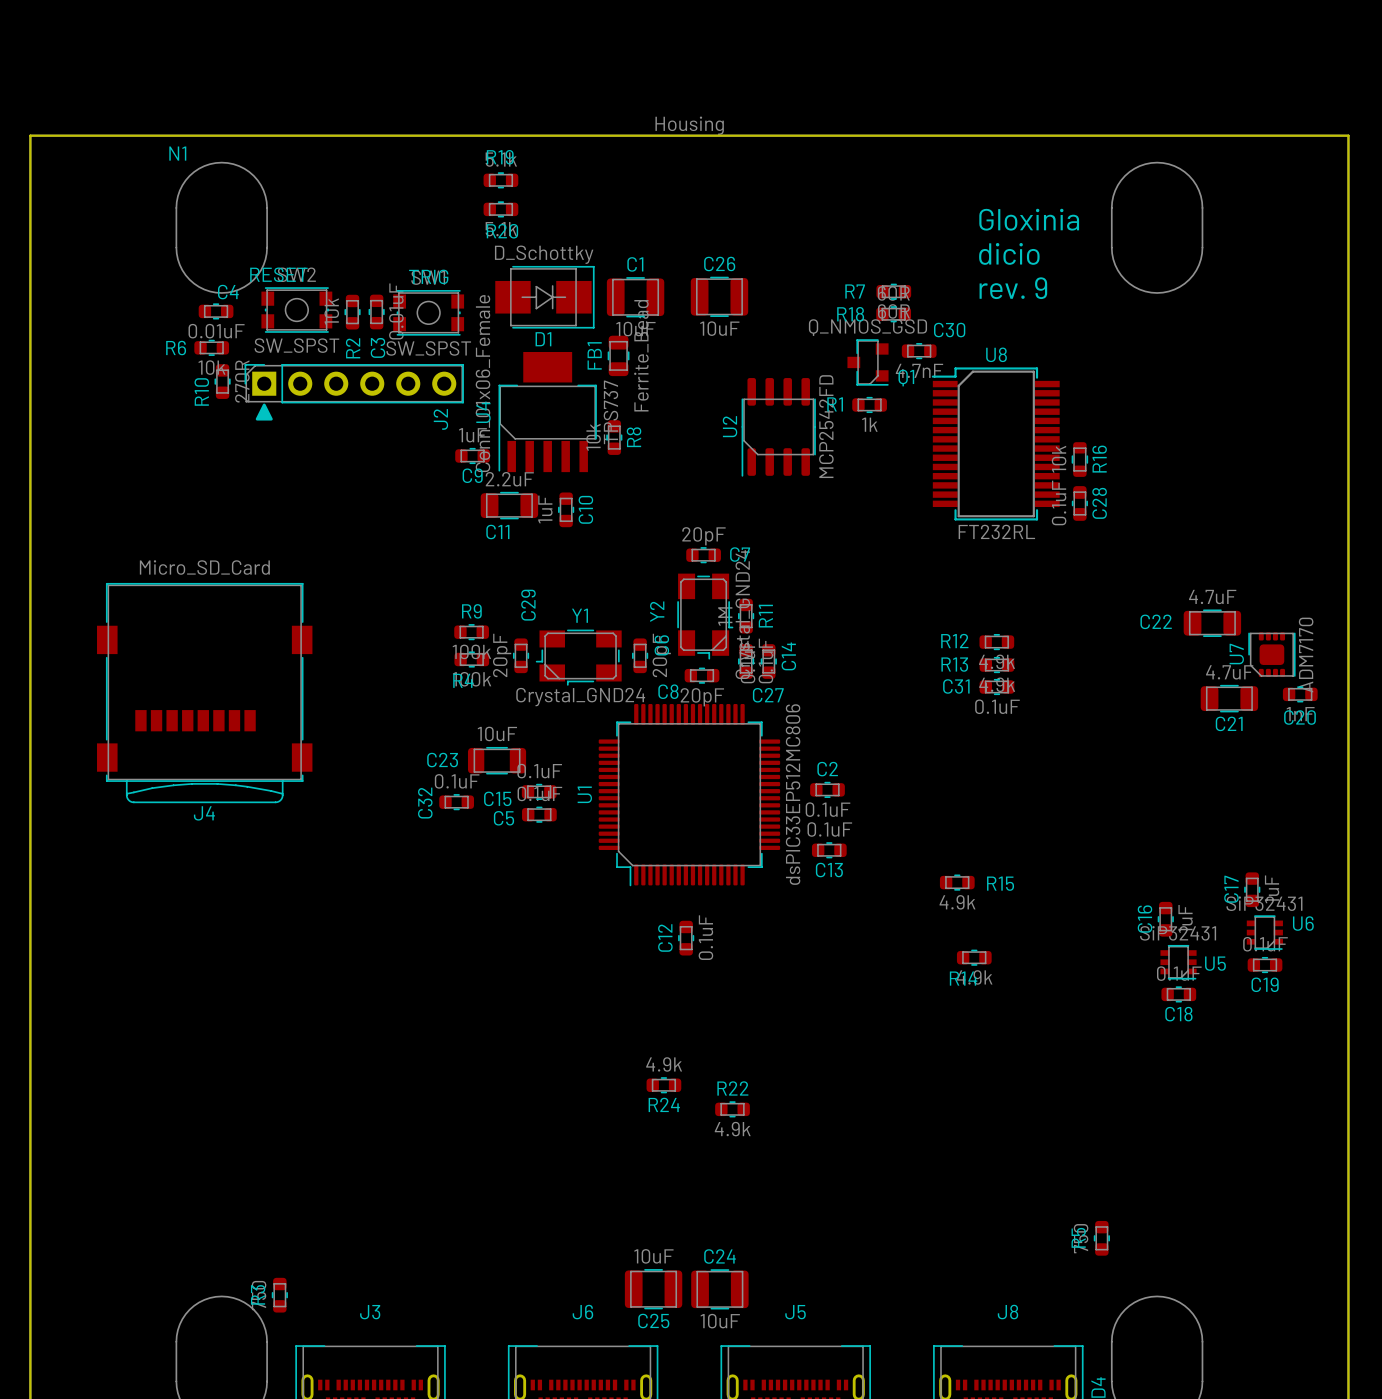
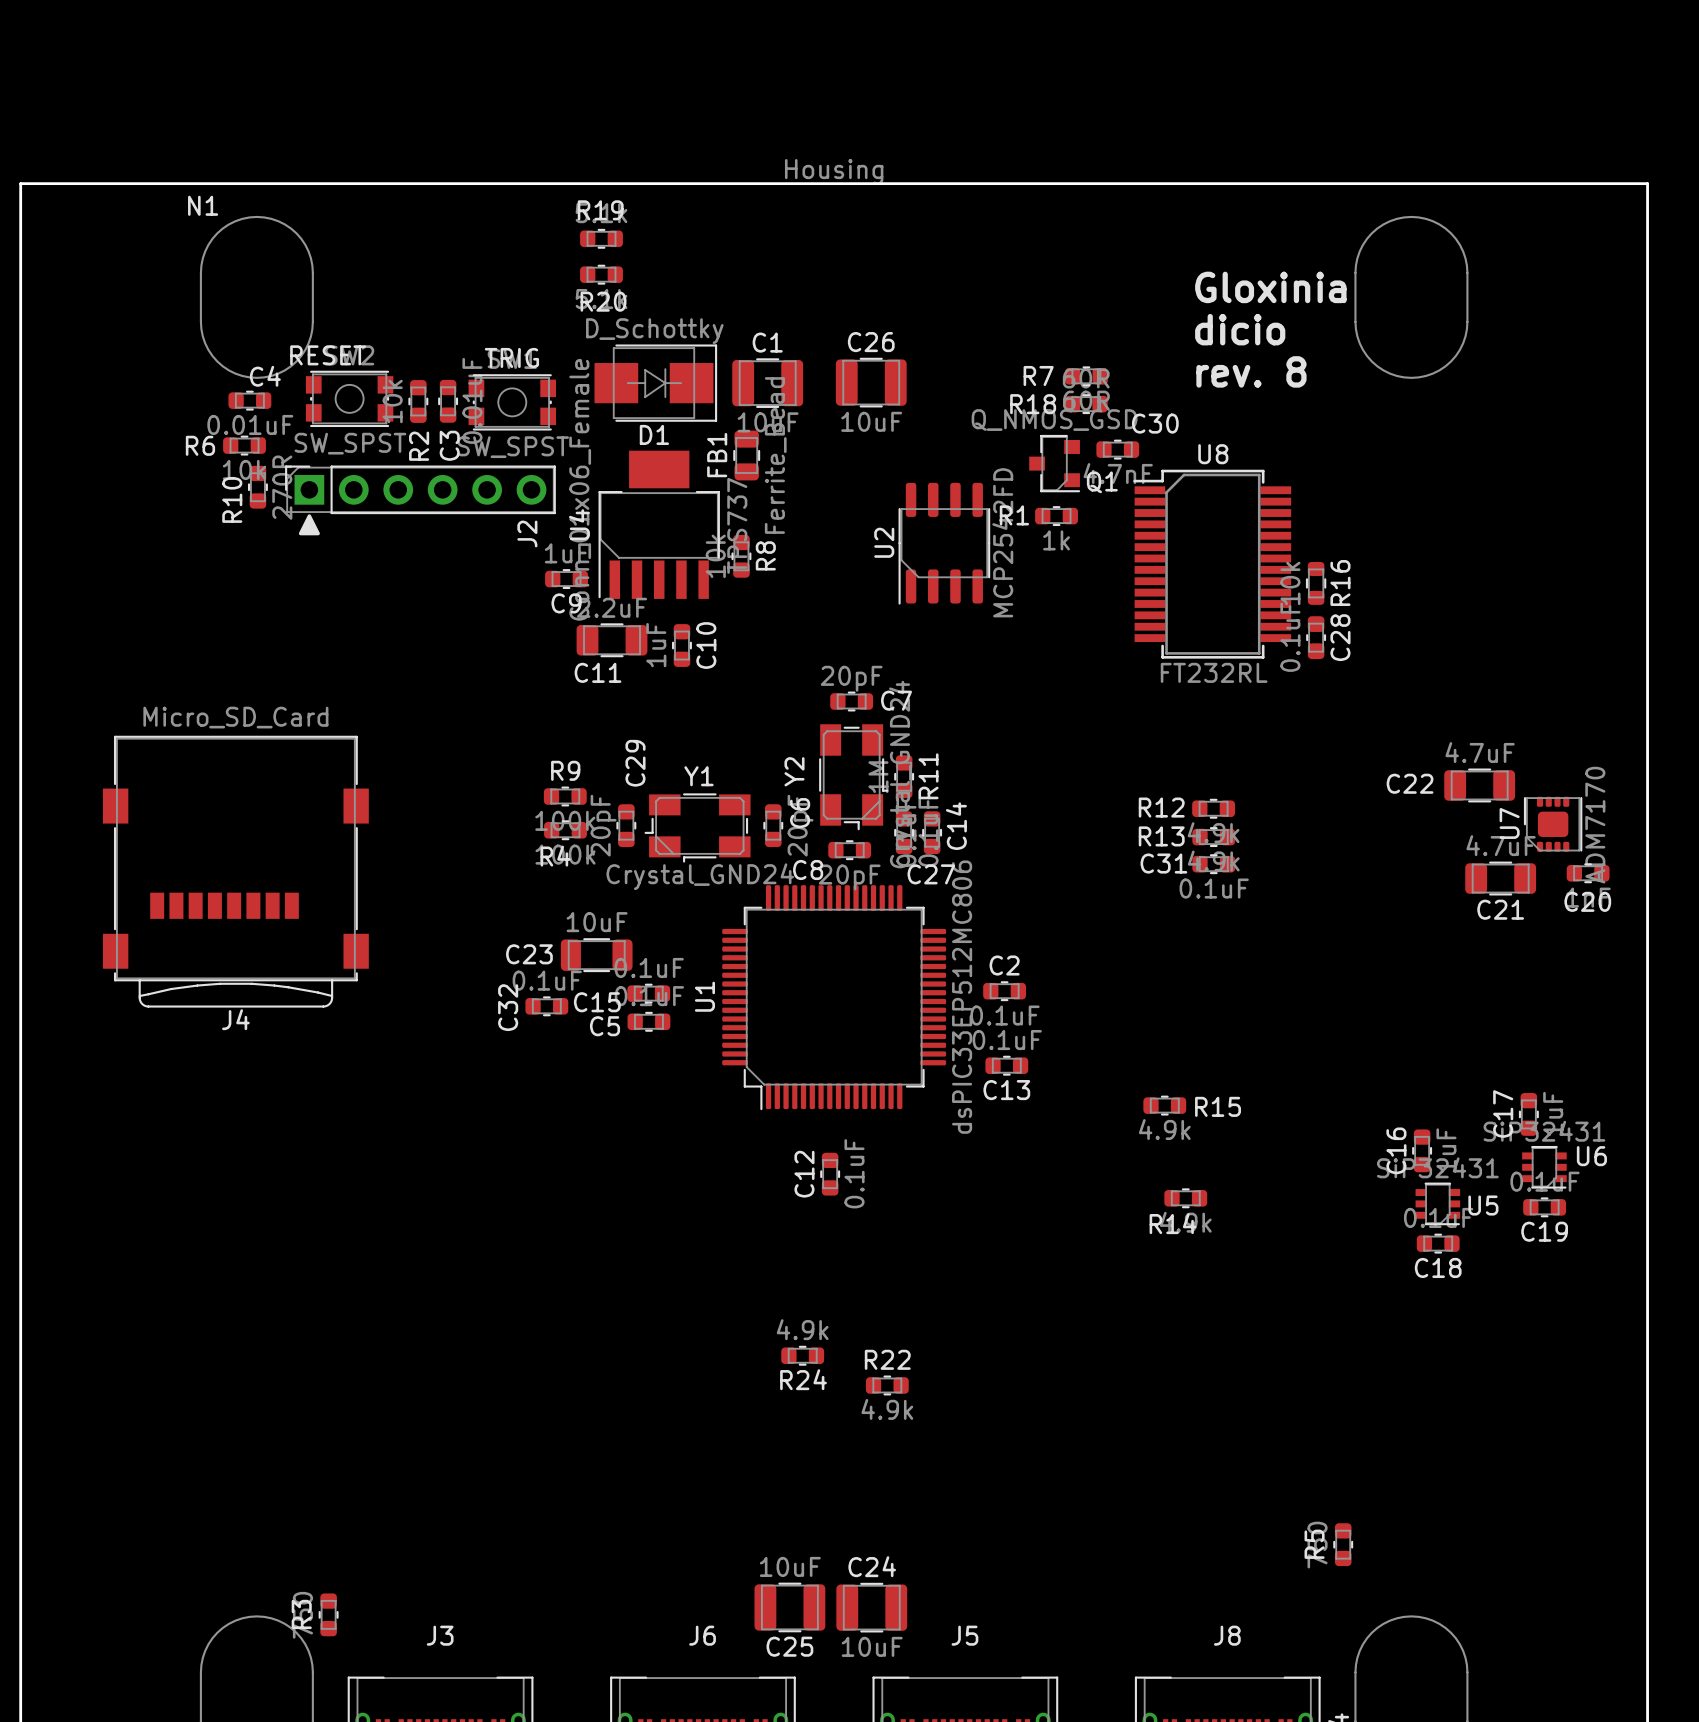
text: rev. 9 (1013, 288) -> rev. 8 (1251, 371)

